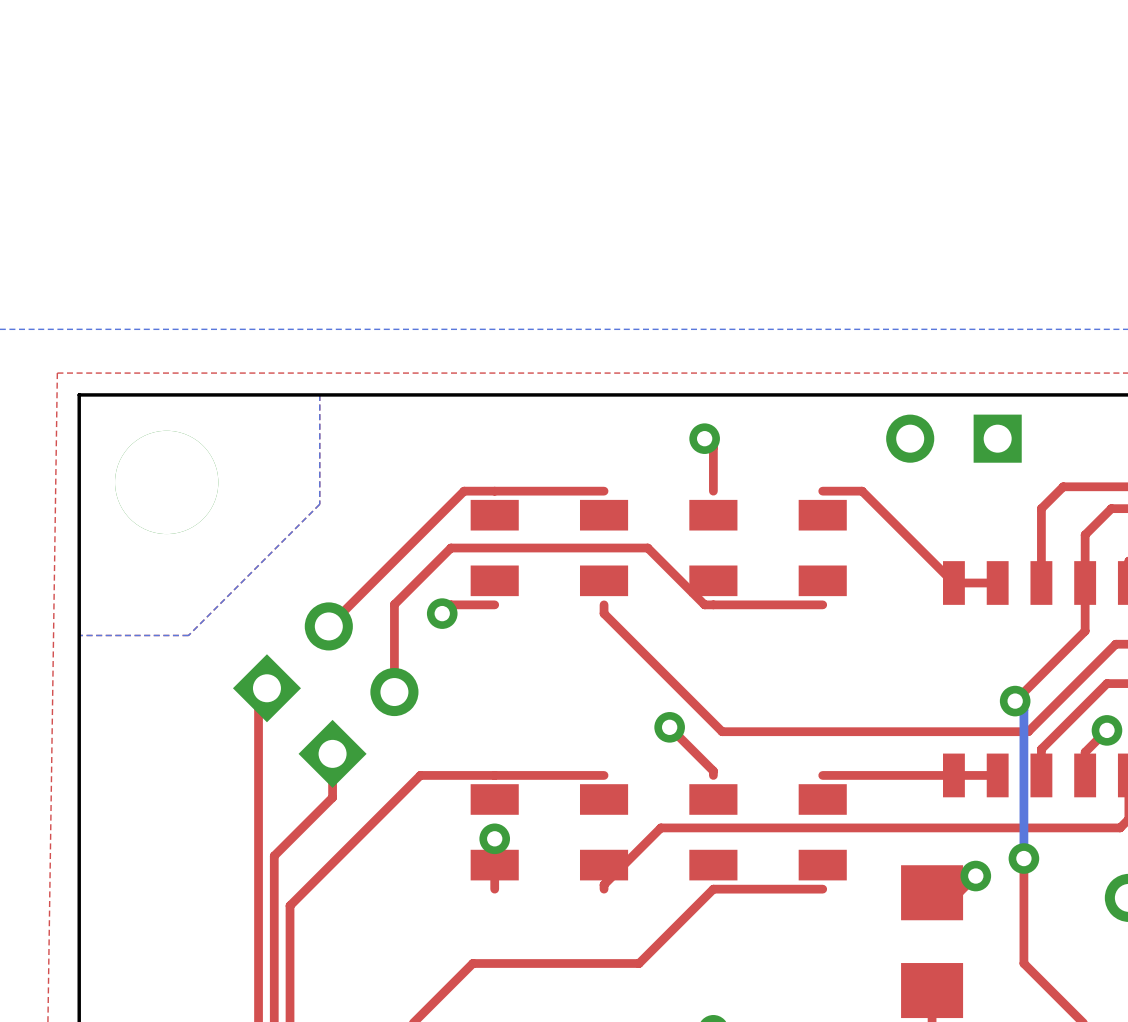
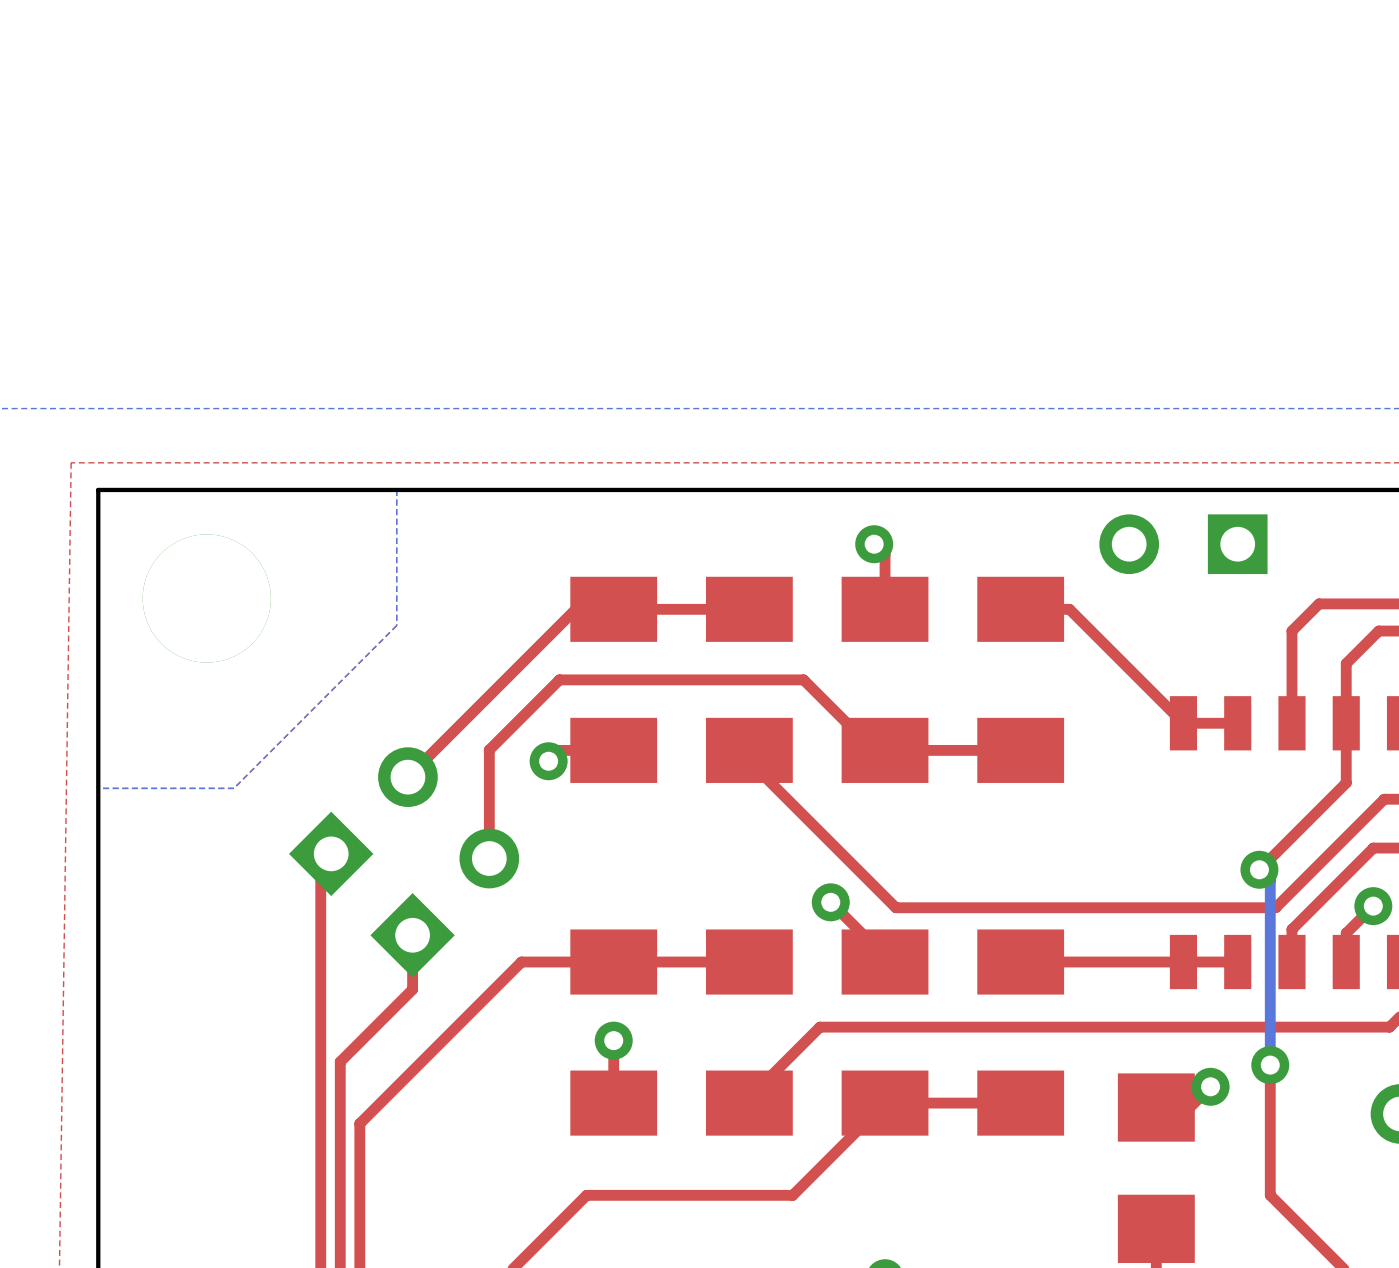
part footprint: [470, 499, 519, 597] -> [570, 576, 658, 783]
part footprint: [579, 499, 629, 597] -> [705, 576, 793, 783]
part footprint: [689, 499, 738, 597] -> [841, 576, 929, 783]
part footprint: [798, 499, 847, 597] -> [977, 576, 1065, 783]
part footprint: [470, 784, 519, 881] -> [570, 929, 658, 1136]
part footprint: [579, 784, 629, 881] -> [705, 929, 793, 1136]
part footprint: [689, 784, 738, 881] -> [841, 929, 929, 1136]
part footprint: [798, 784, 847, 881] -> [977, 929, 1065, 1136]

